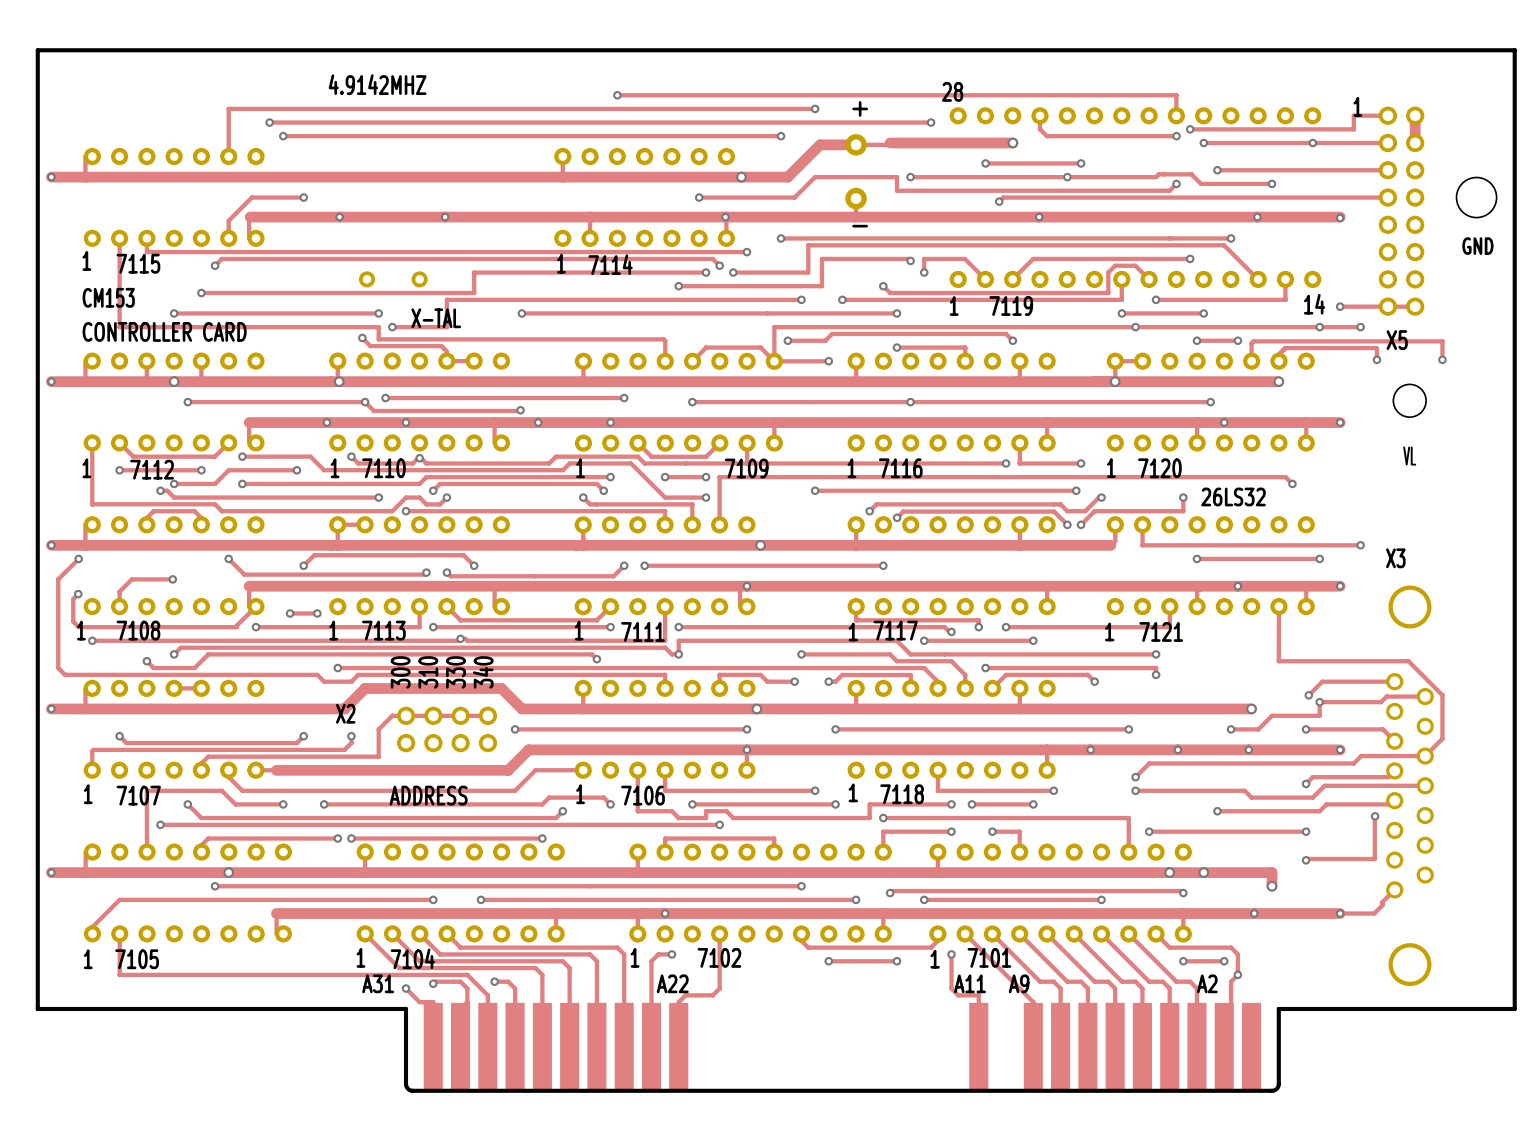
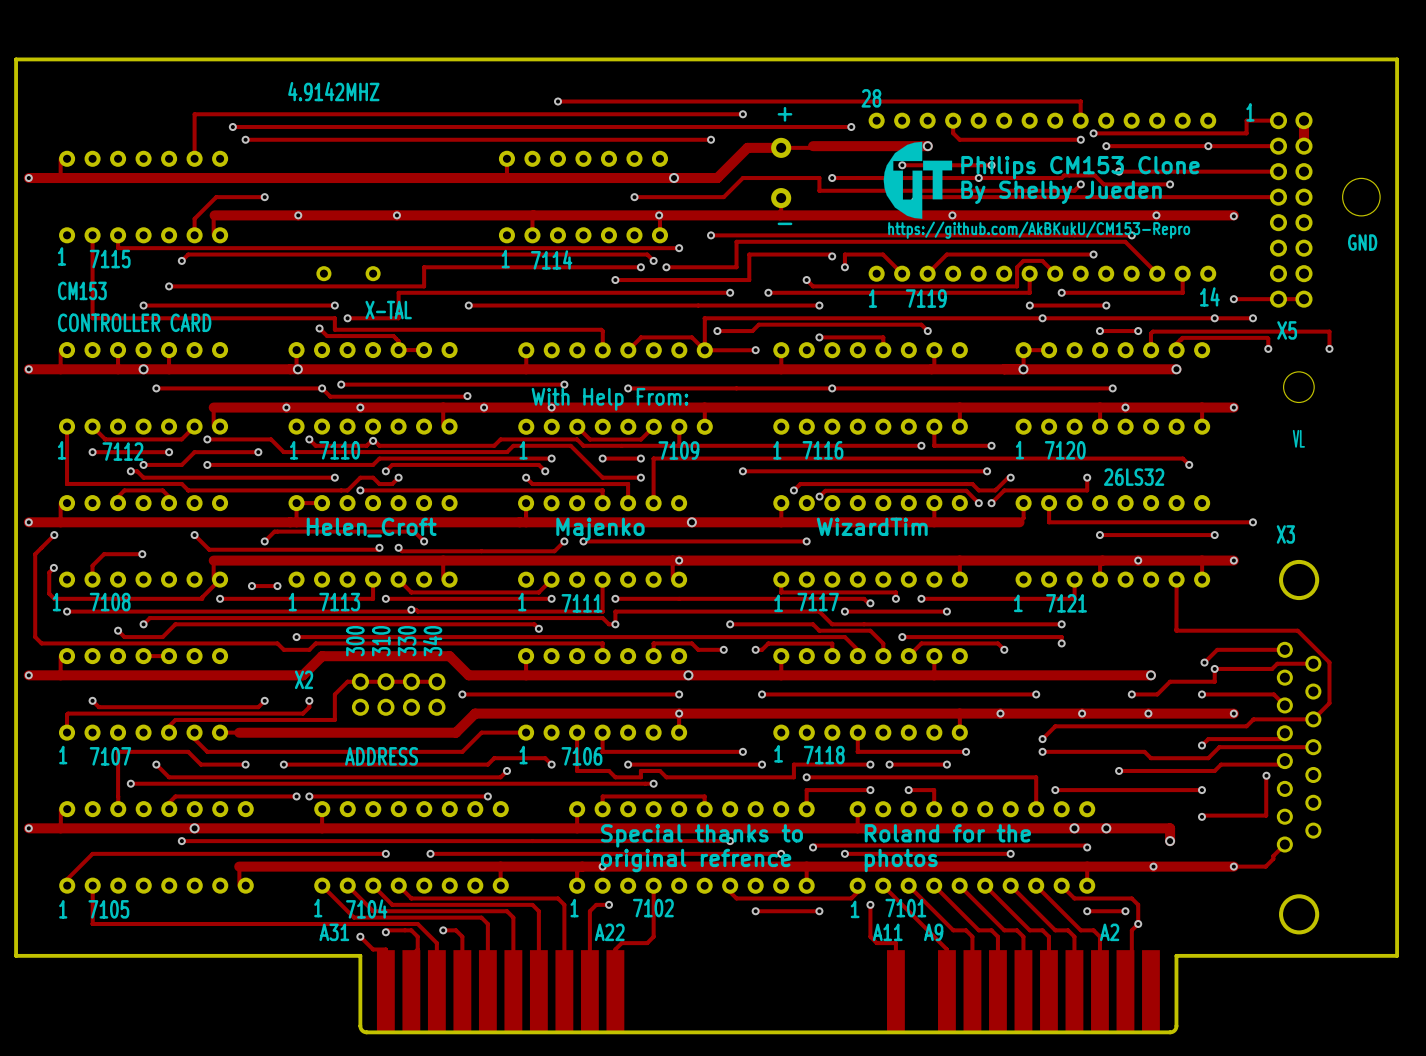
drawing: none -> [883, 141, 953, 219]
text: none -> Philips CM153 Clone (1080, 167)
text: none -> By Shelby Jueden (1061, 192)
text: none -> https://github.com/AkBKukU/CM153-Repro (1039, 230)
text: none -> With Help From: (609, 399)
text: none -> Helen_Croft (371, 527)
text: none -> WizardTim (872, 526)
text: none -> Majenko (600, 529)
text: none -> Special thanks to Roland for the (815, 835)
text: none -> original refrence photos (769, 860)

